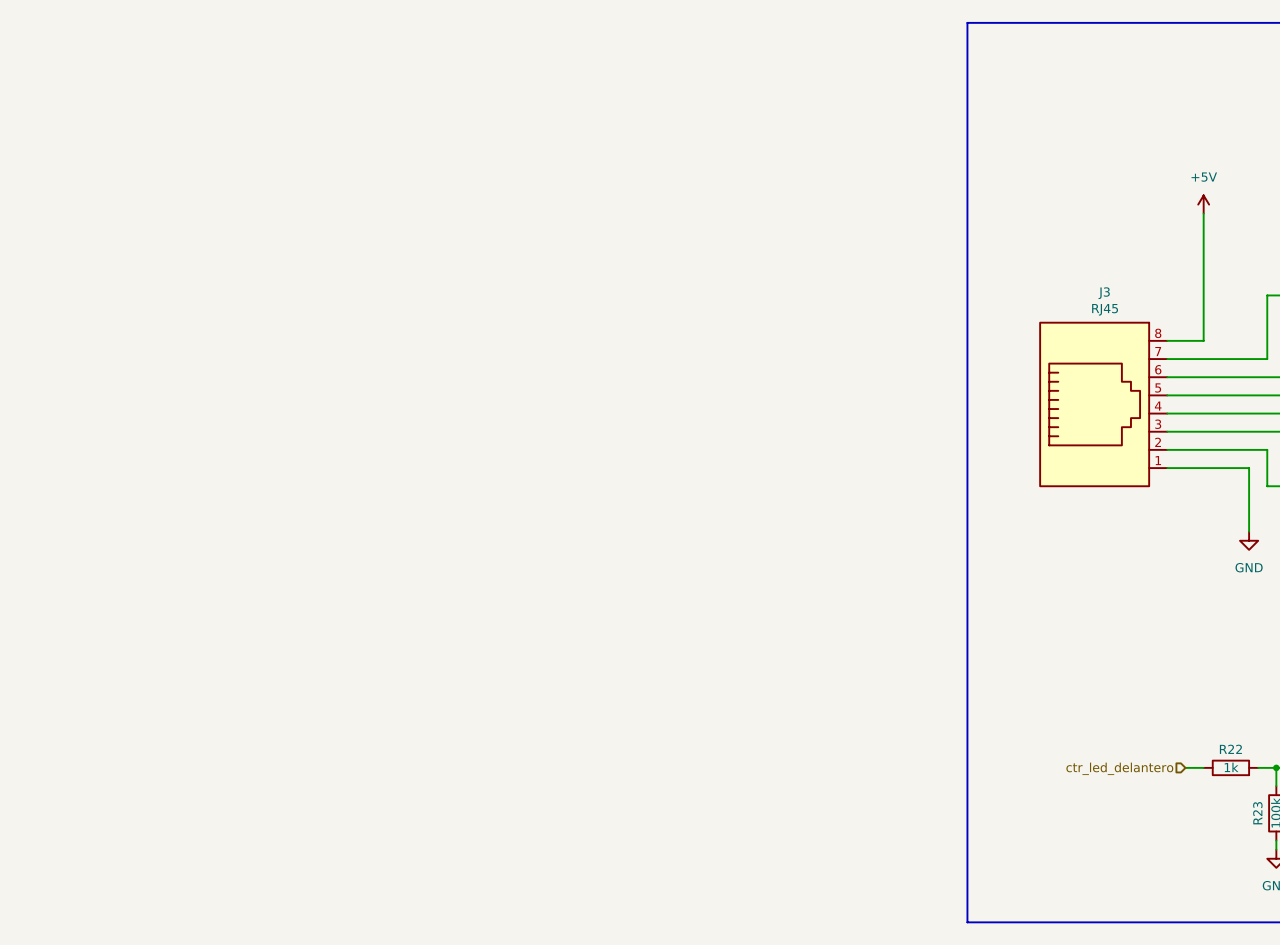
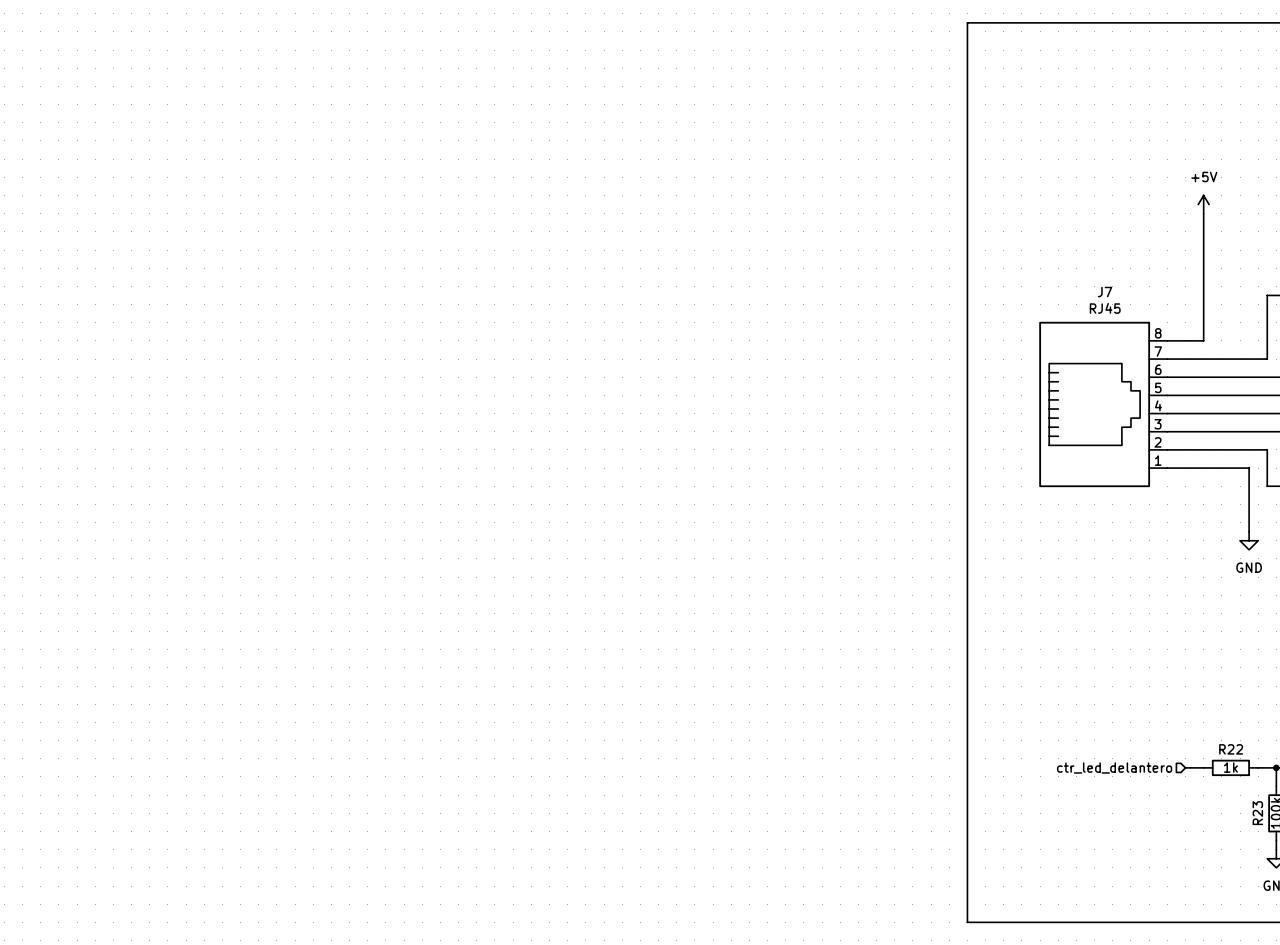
J3 name: J3 (1104, 293) -> J7 (1105, 292)

